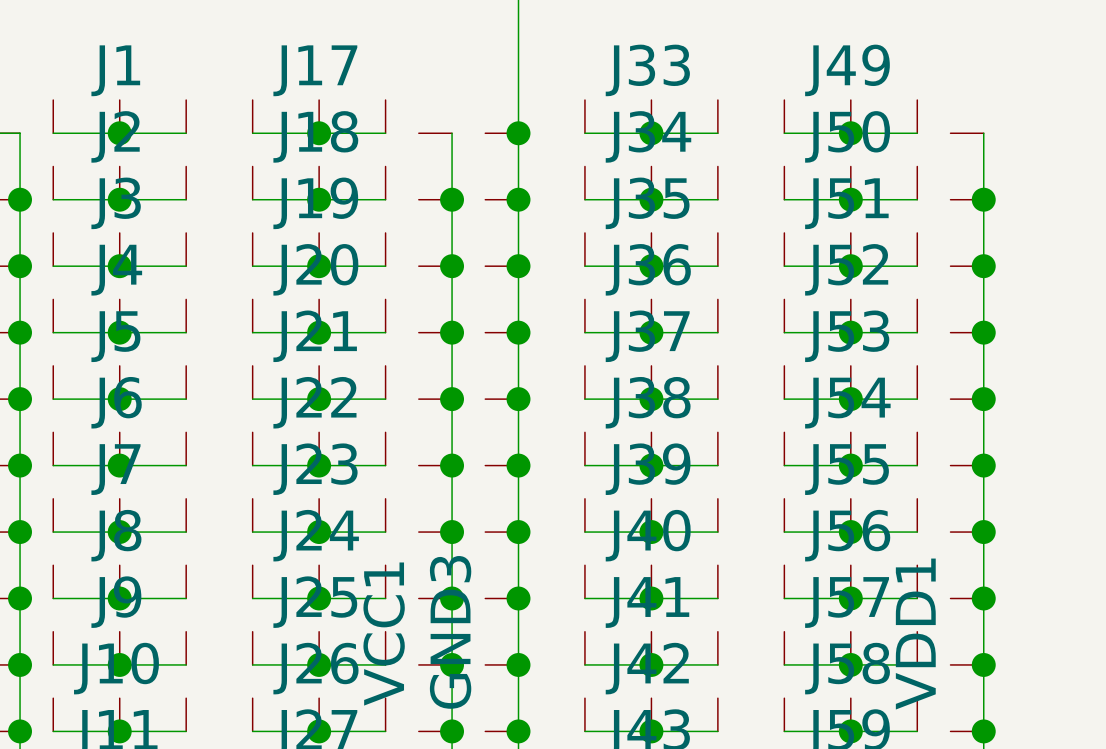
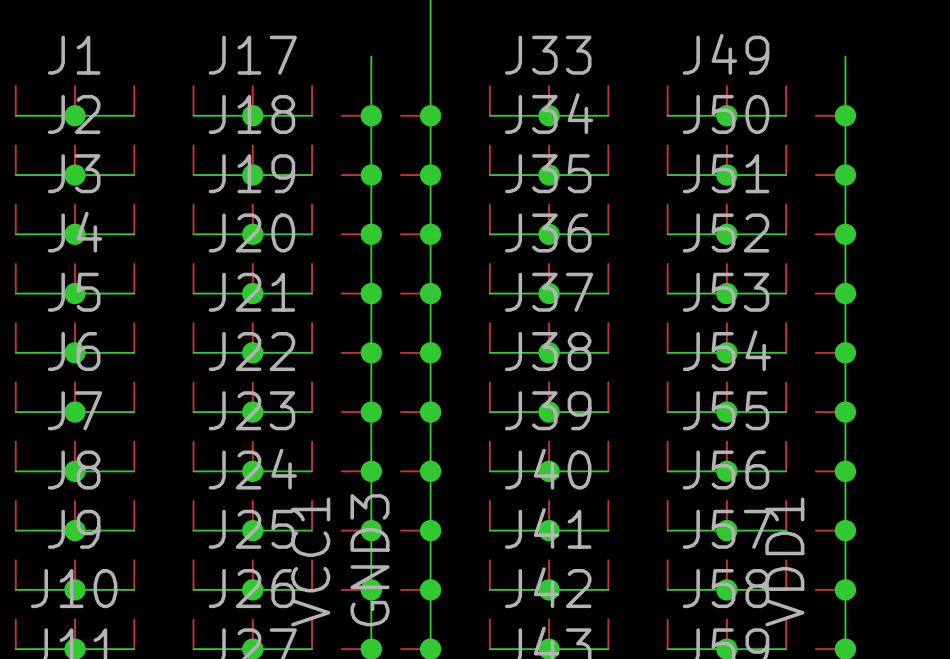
wire: none -> (371, 56) (371, 115)
wire: none -> (845, 56) (845, 115)
junction: none -> (371, 115)
junction: none -> (845, 115)

